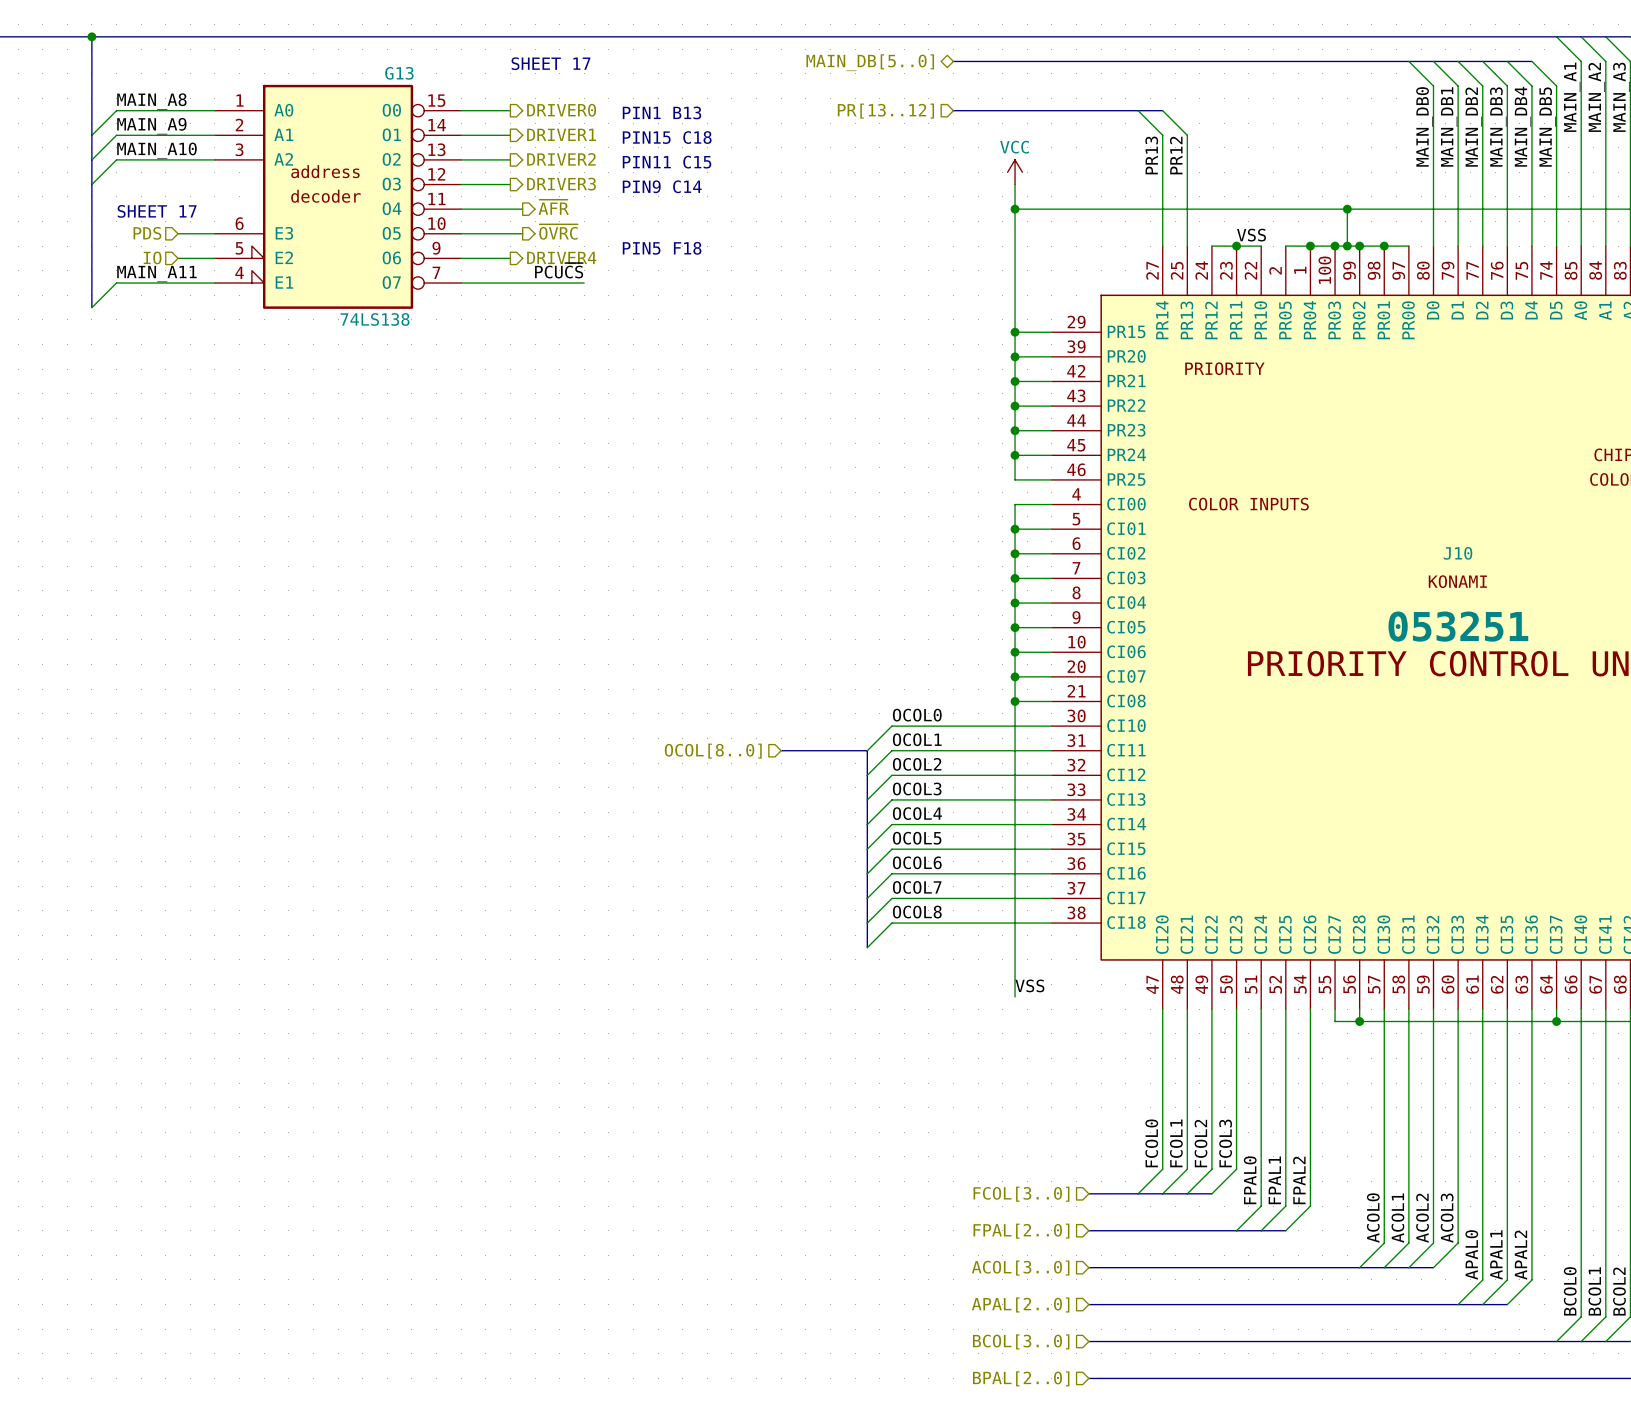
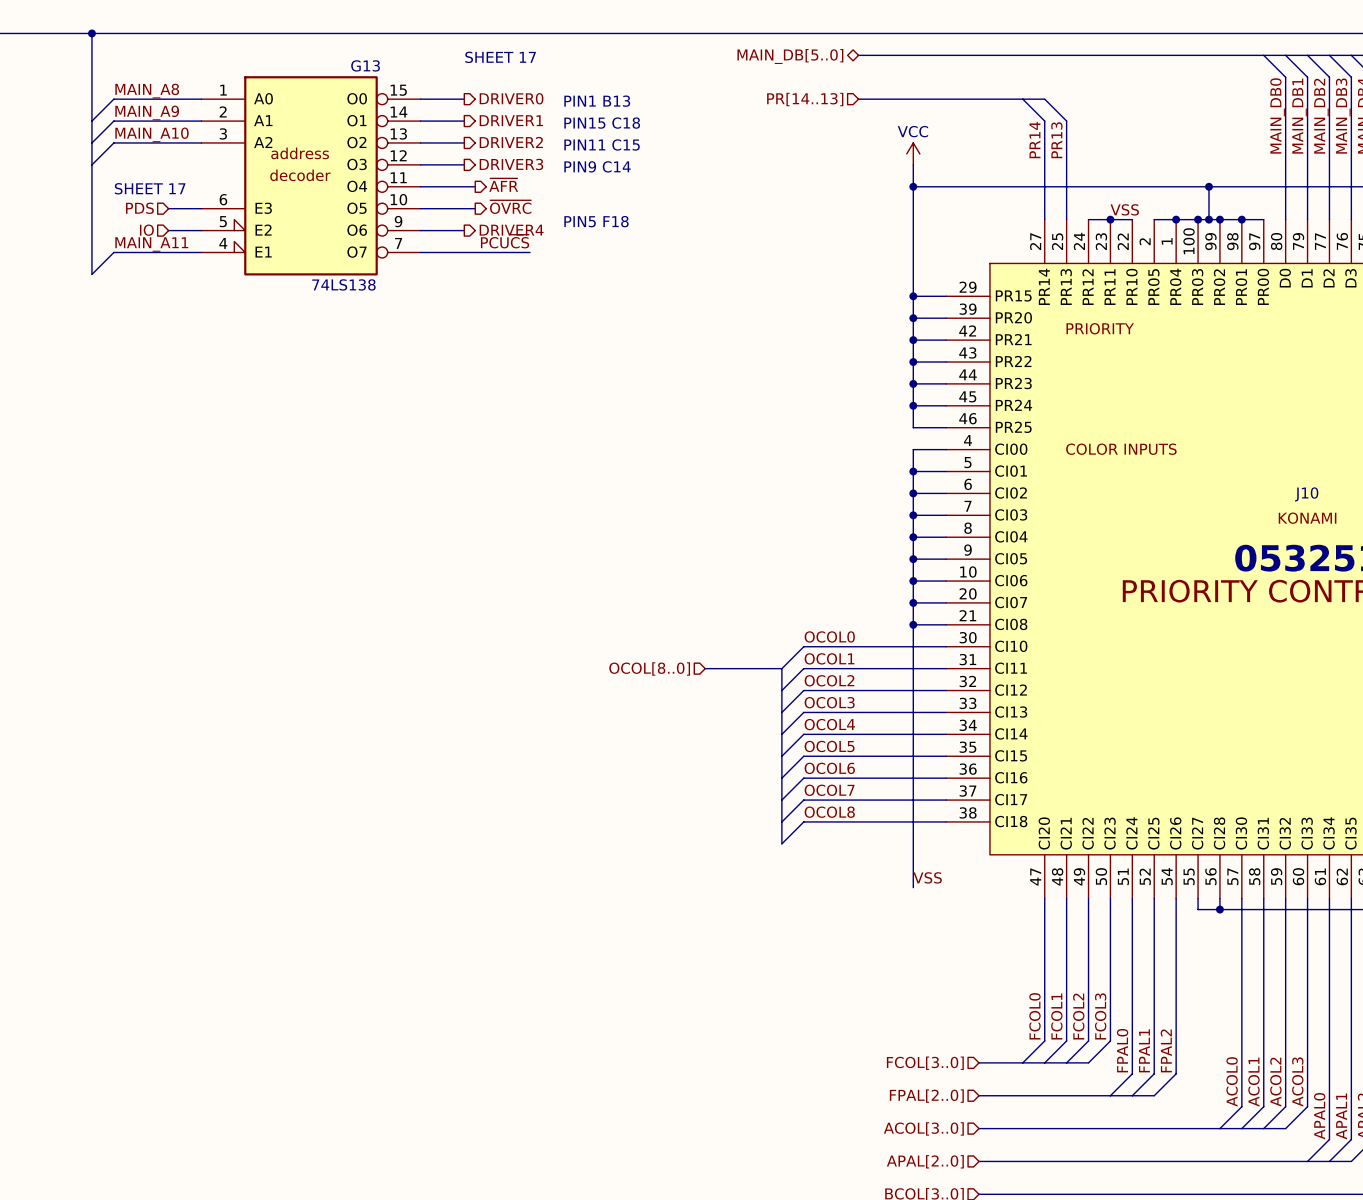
hierarchical label: PR[13..12] (885, 111) -> PR[14..13] (805, 99)
label: PR13 (1151, 155) -> PR14 (1034, 140)
label: PR12 (1176, 155) -> PR13 (1056, 140)

